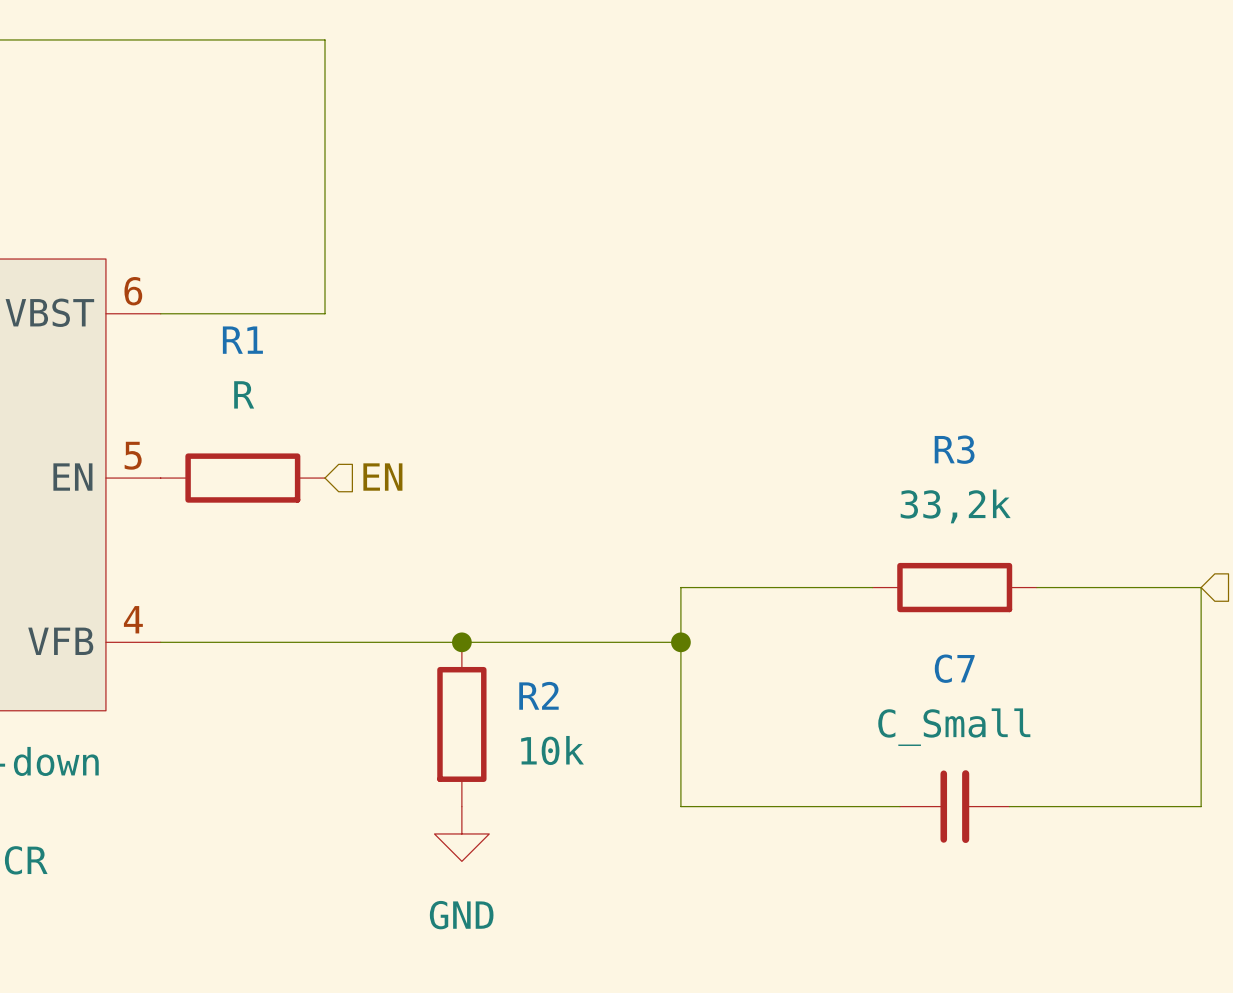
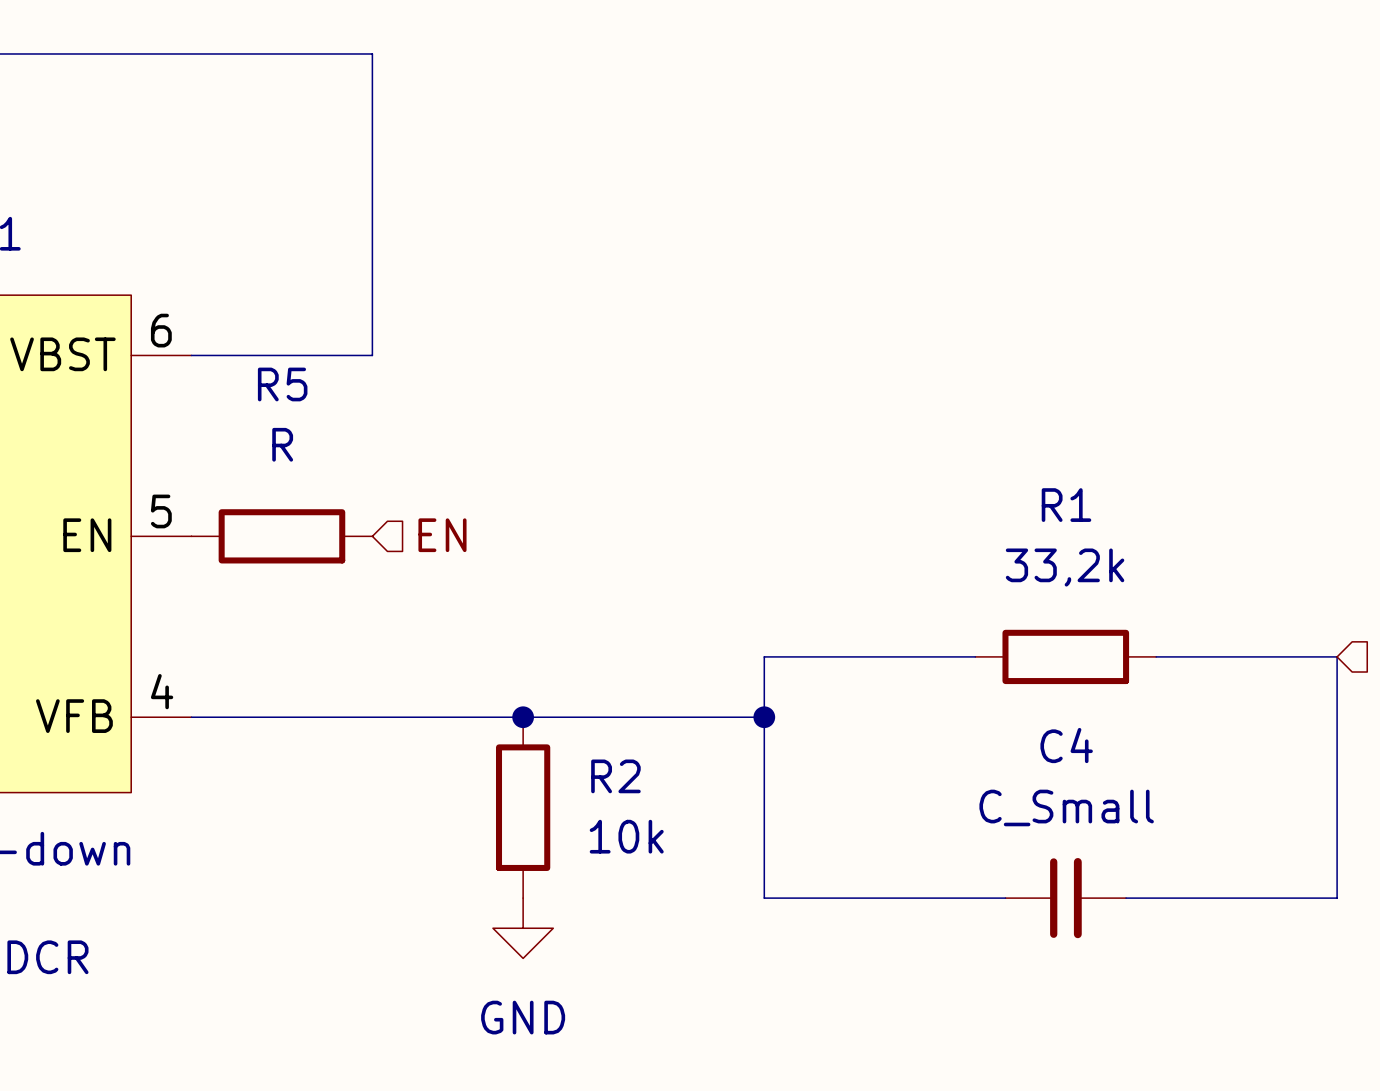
R1 name: R1 (242, 340) -> R5 (282, 384)
R3 name: R3 (954, 449) -> R1 (1066, 505)
C7 name: C7 (954, 668) -> C4 (1066, 745)

